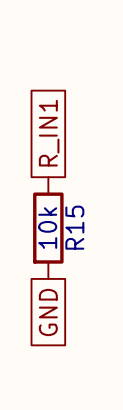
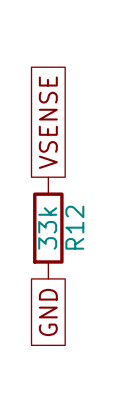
global label: R_IN1 (49, 133) -> VSENSE (48, 122)
R15 name: R15 (74, 227) -> R12 (74, 227)
R15 value: 10k (47, 228) -> 33k (47, 228)

